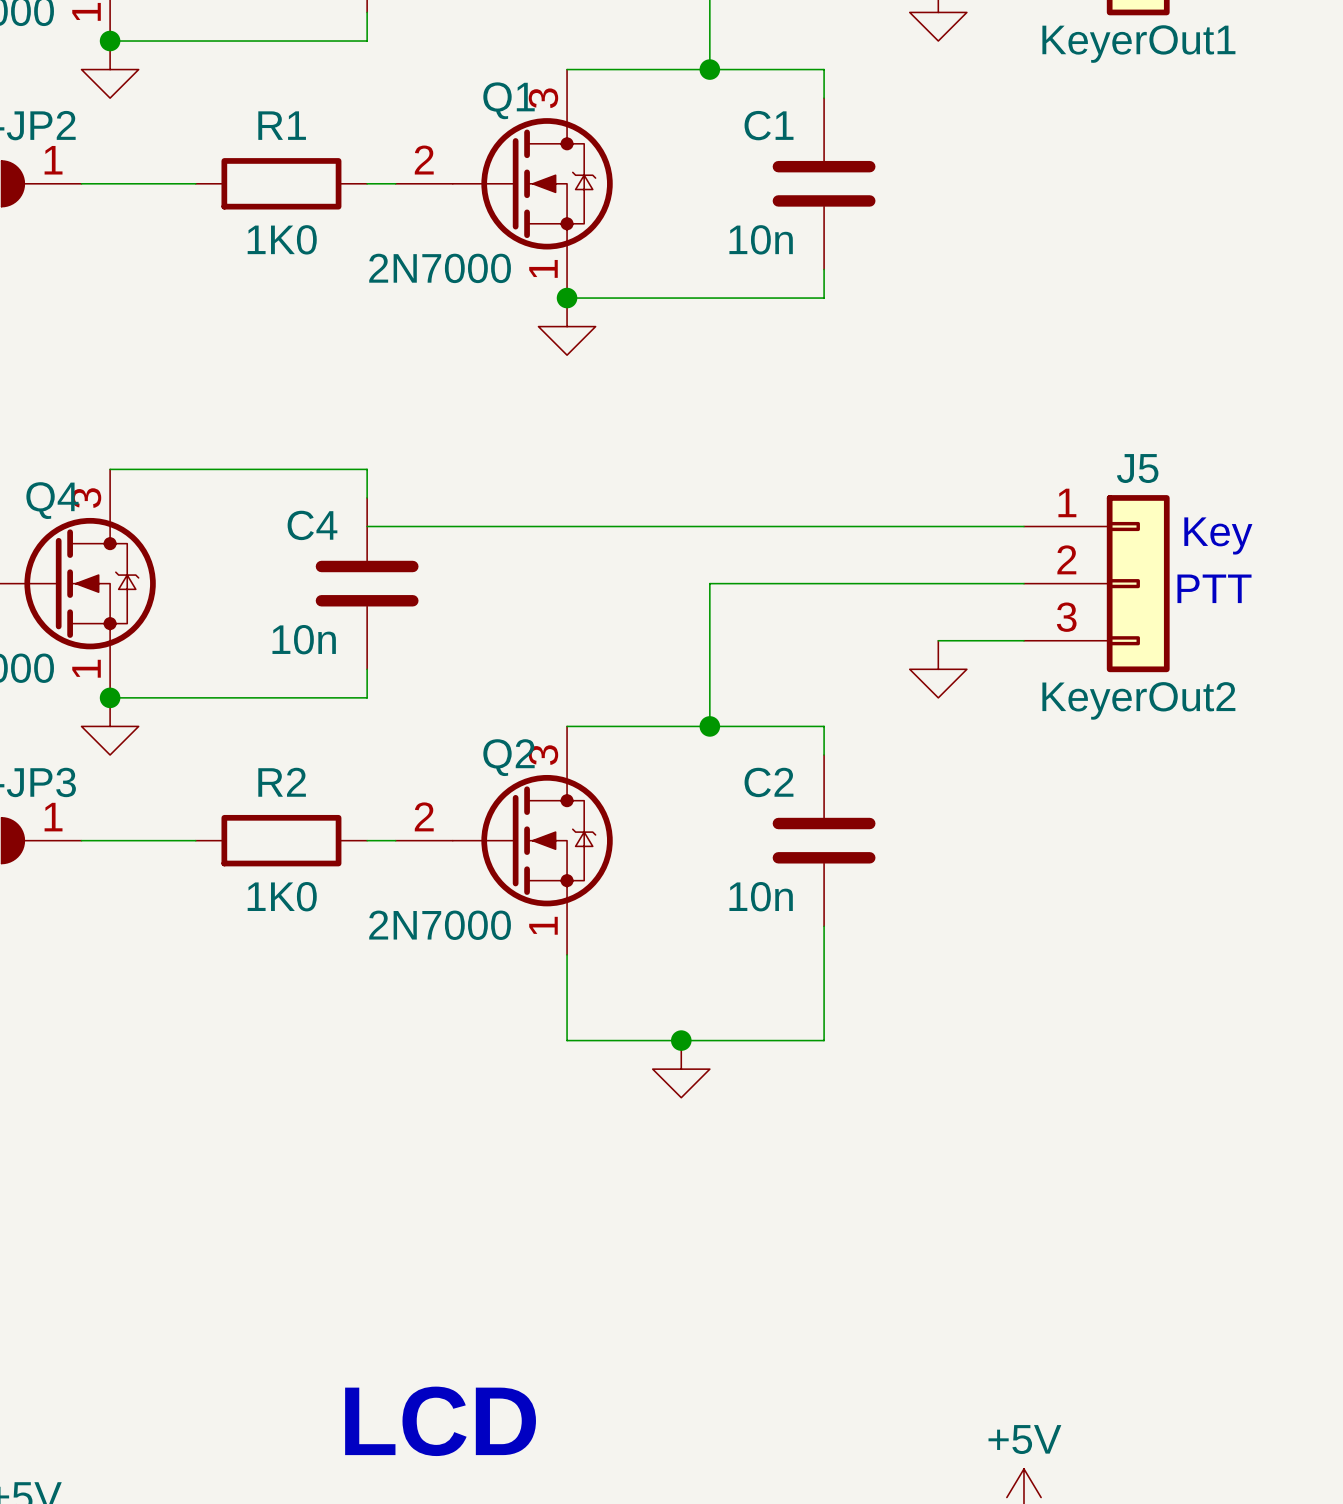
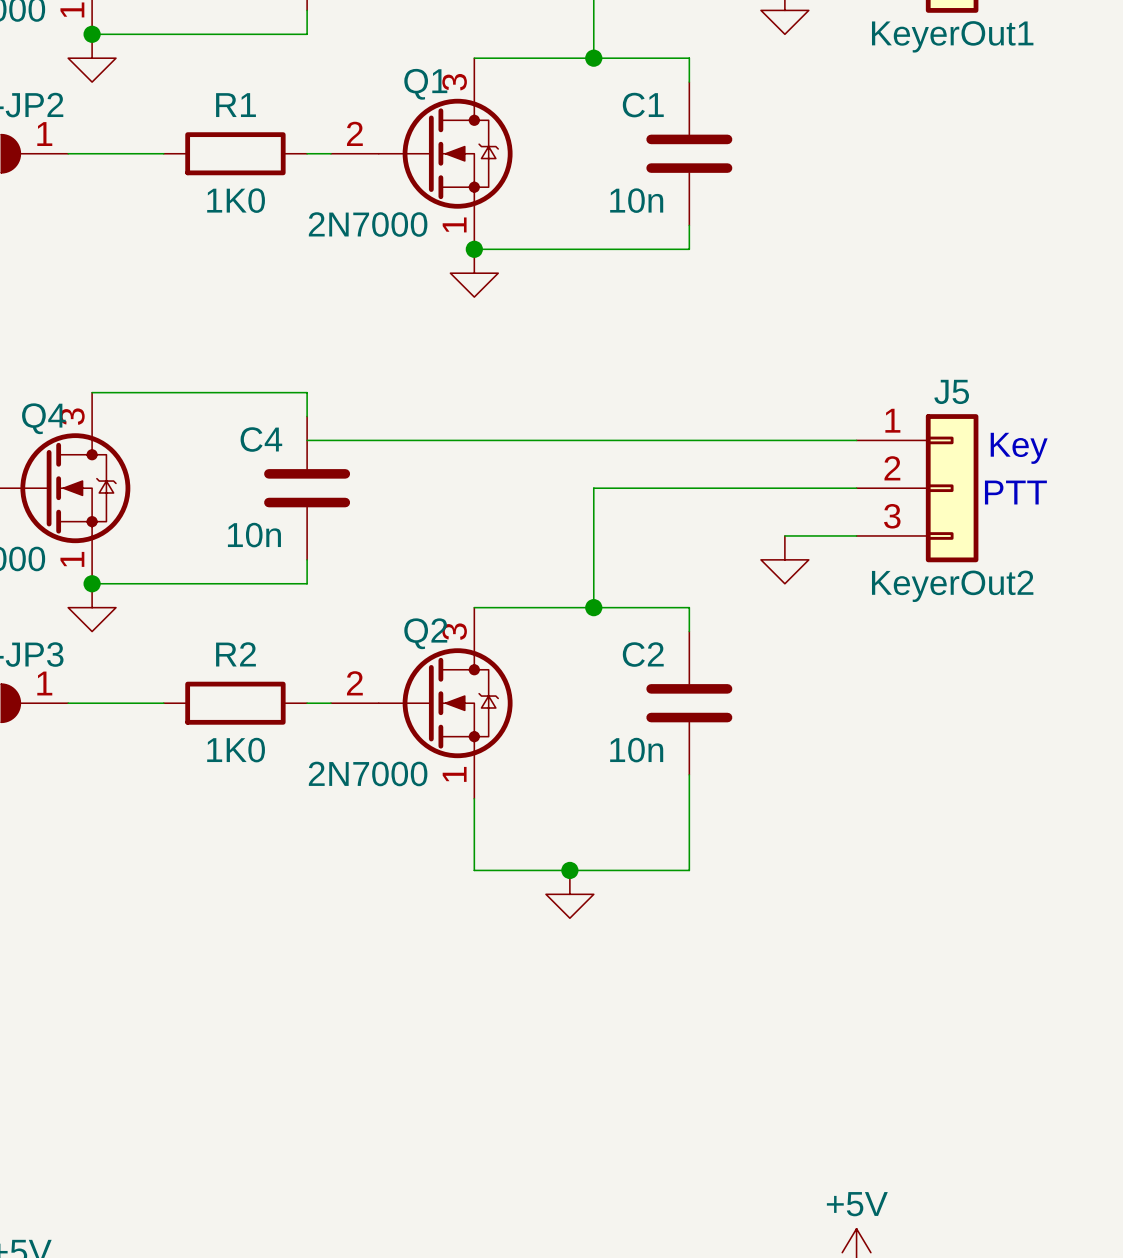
text: LCD (440, 1421) -> none

